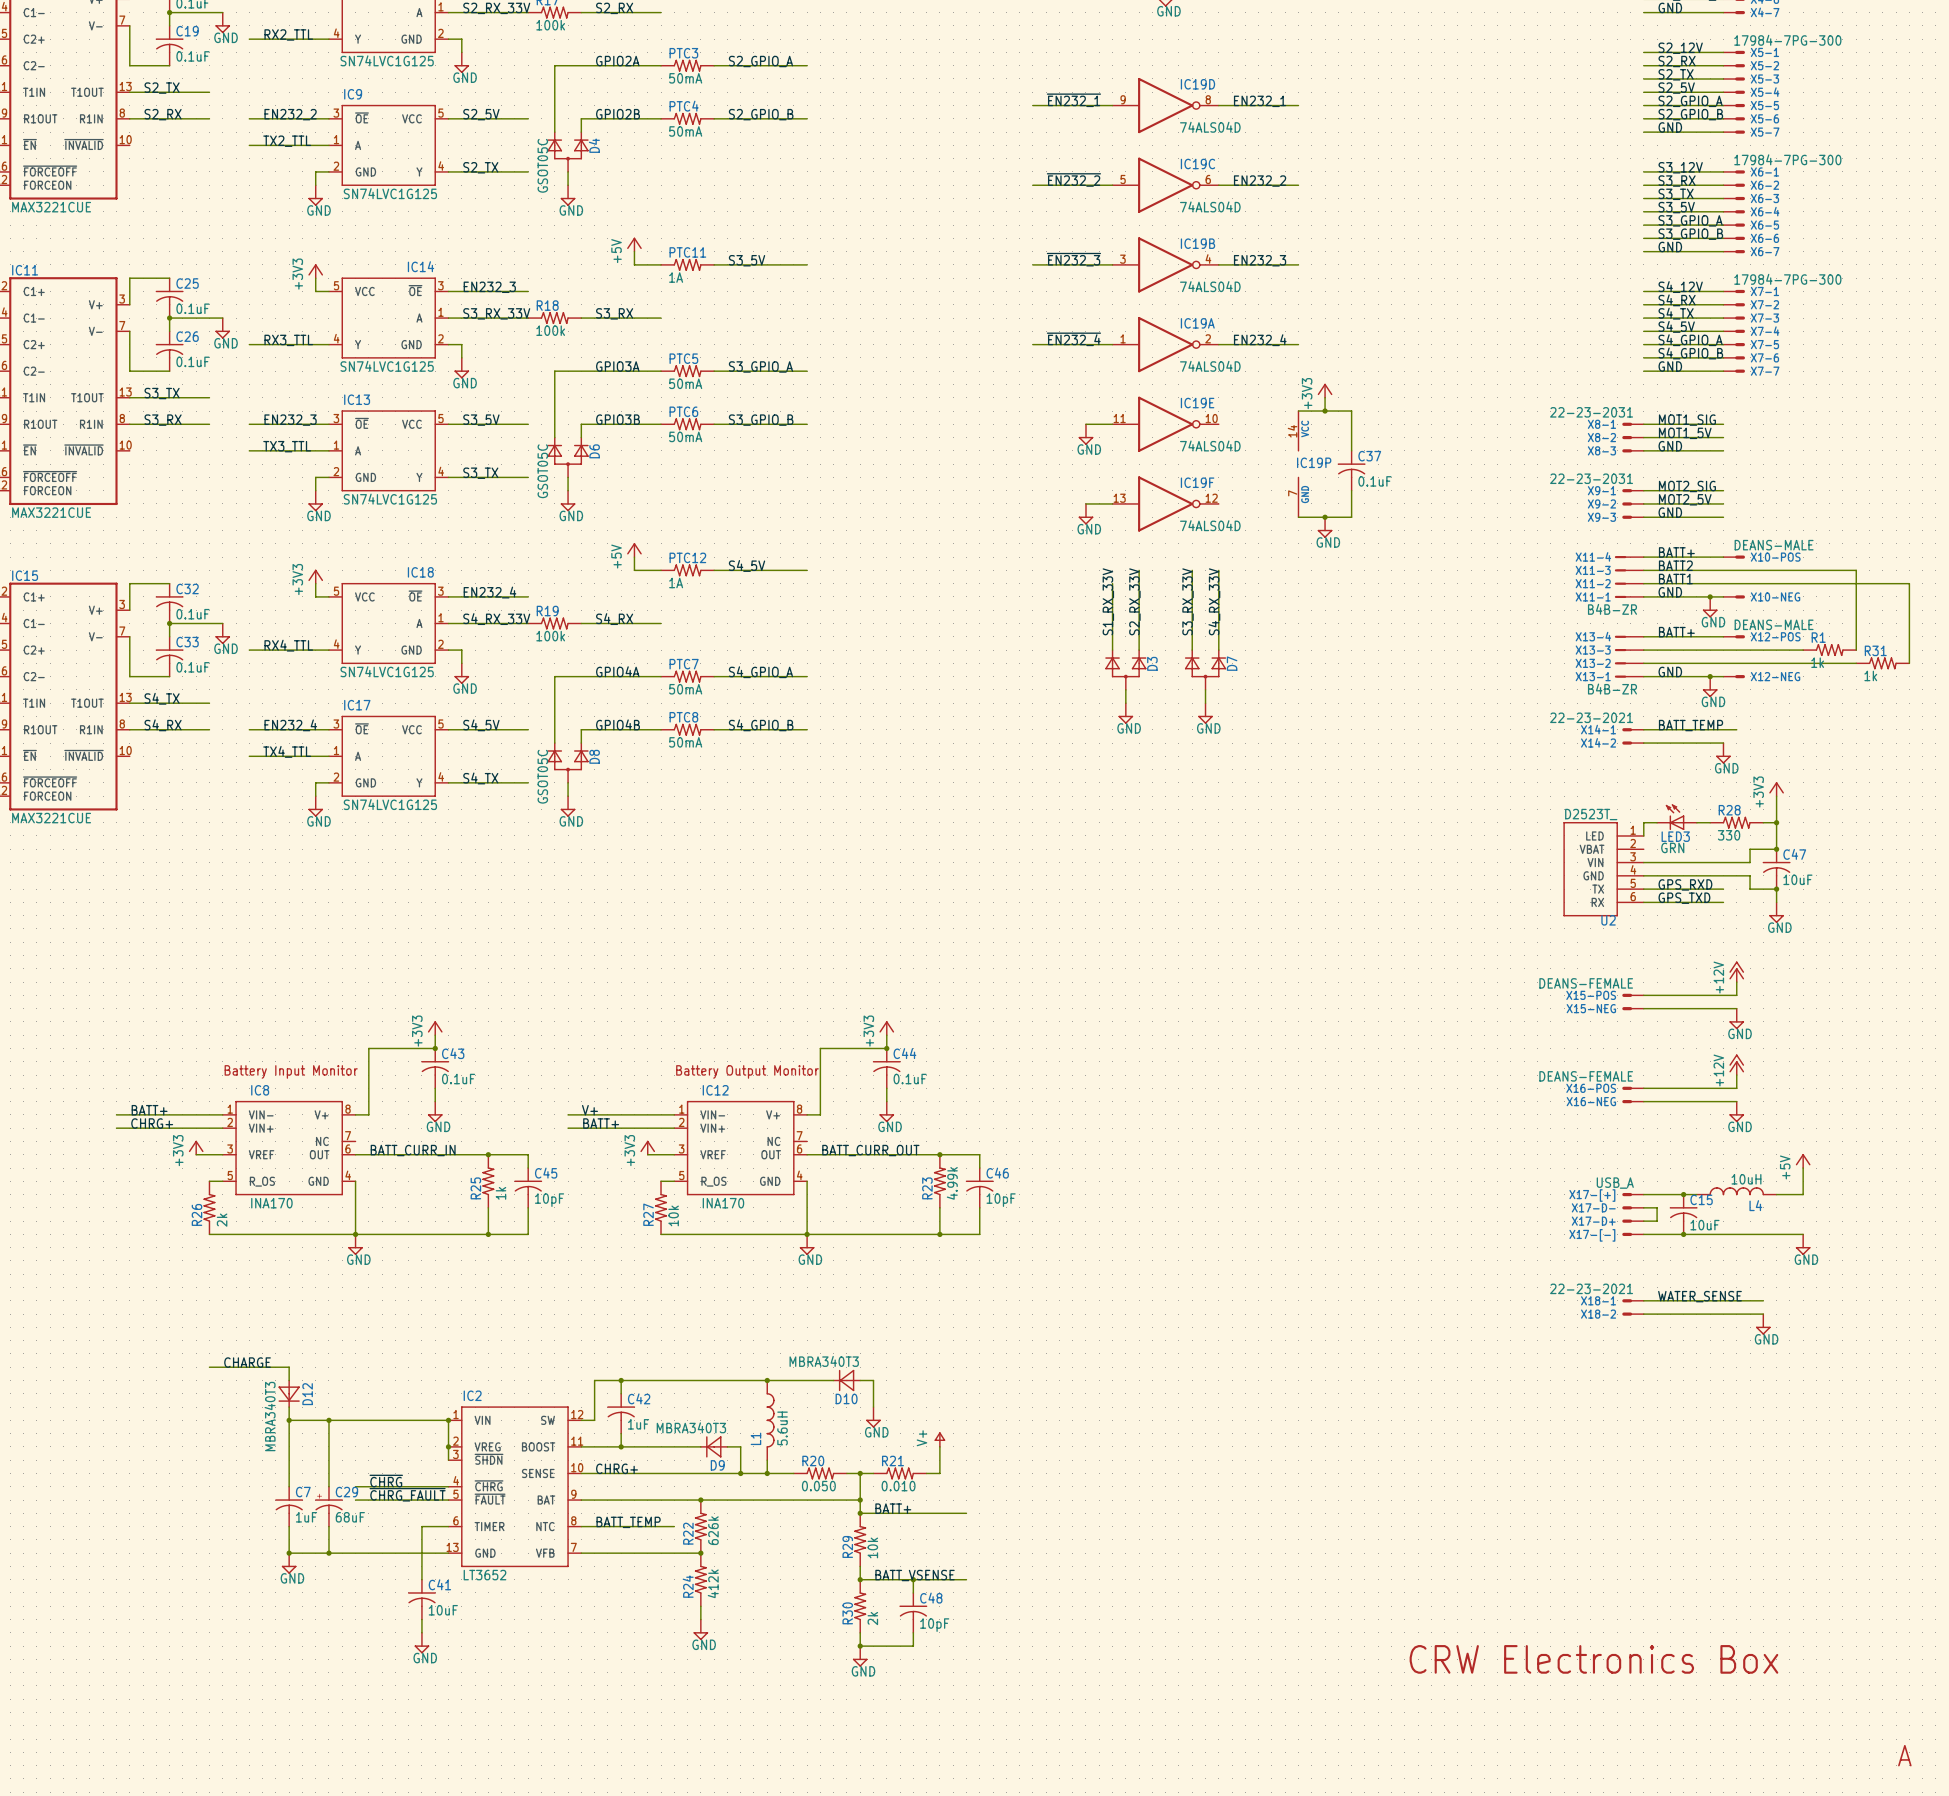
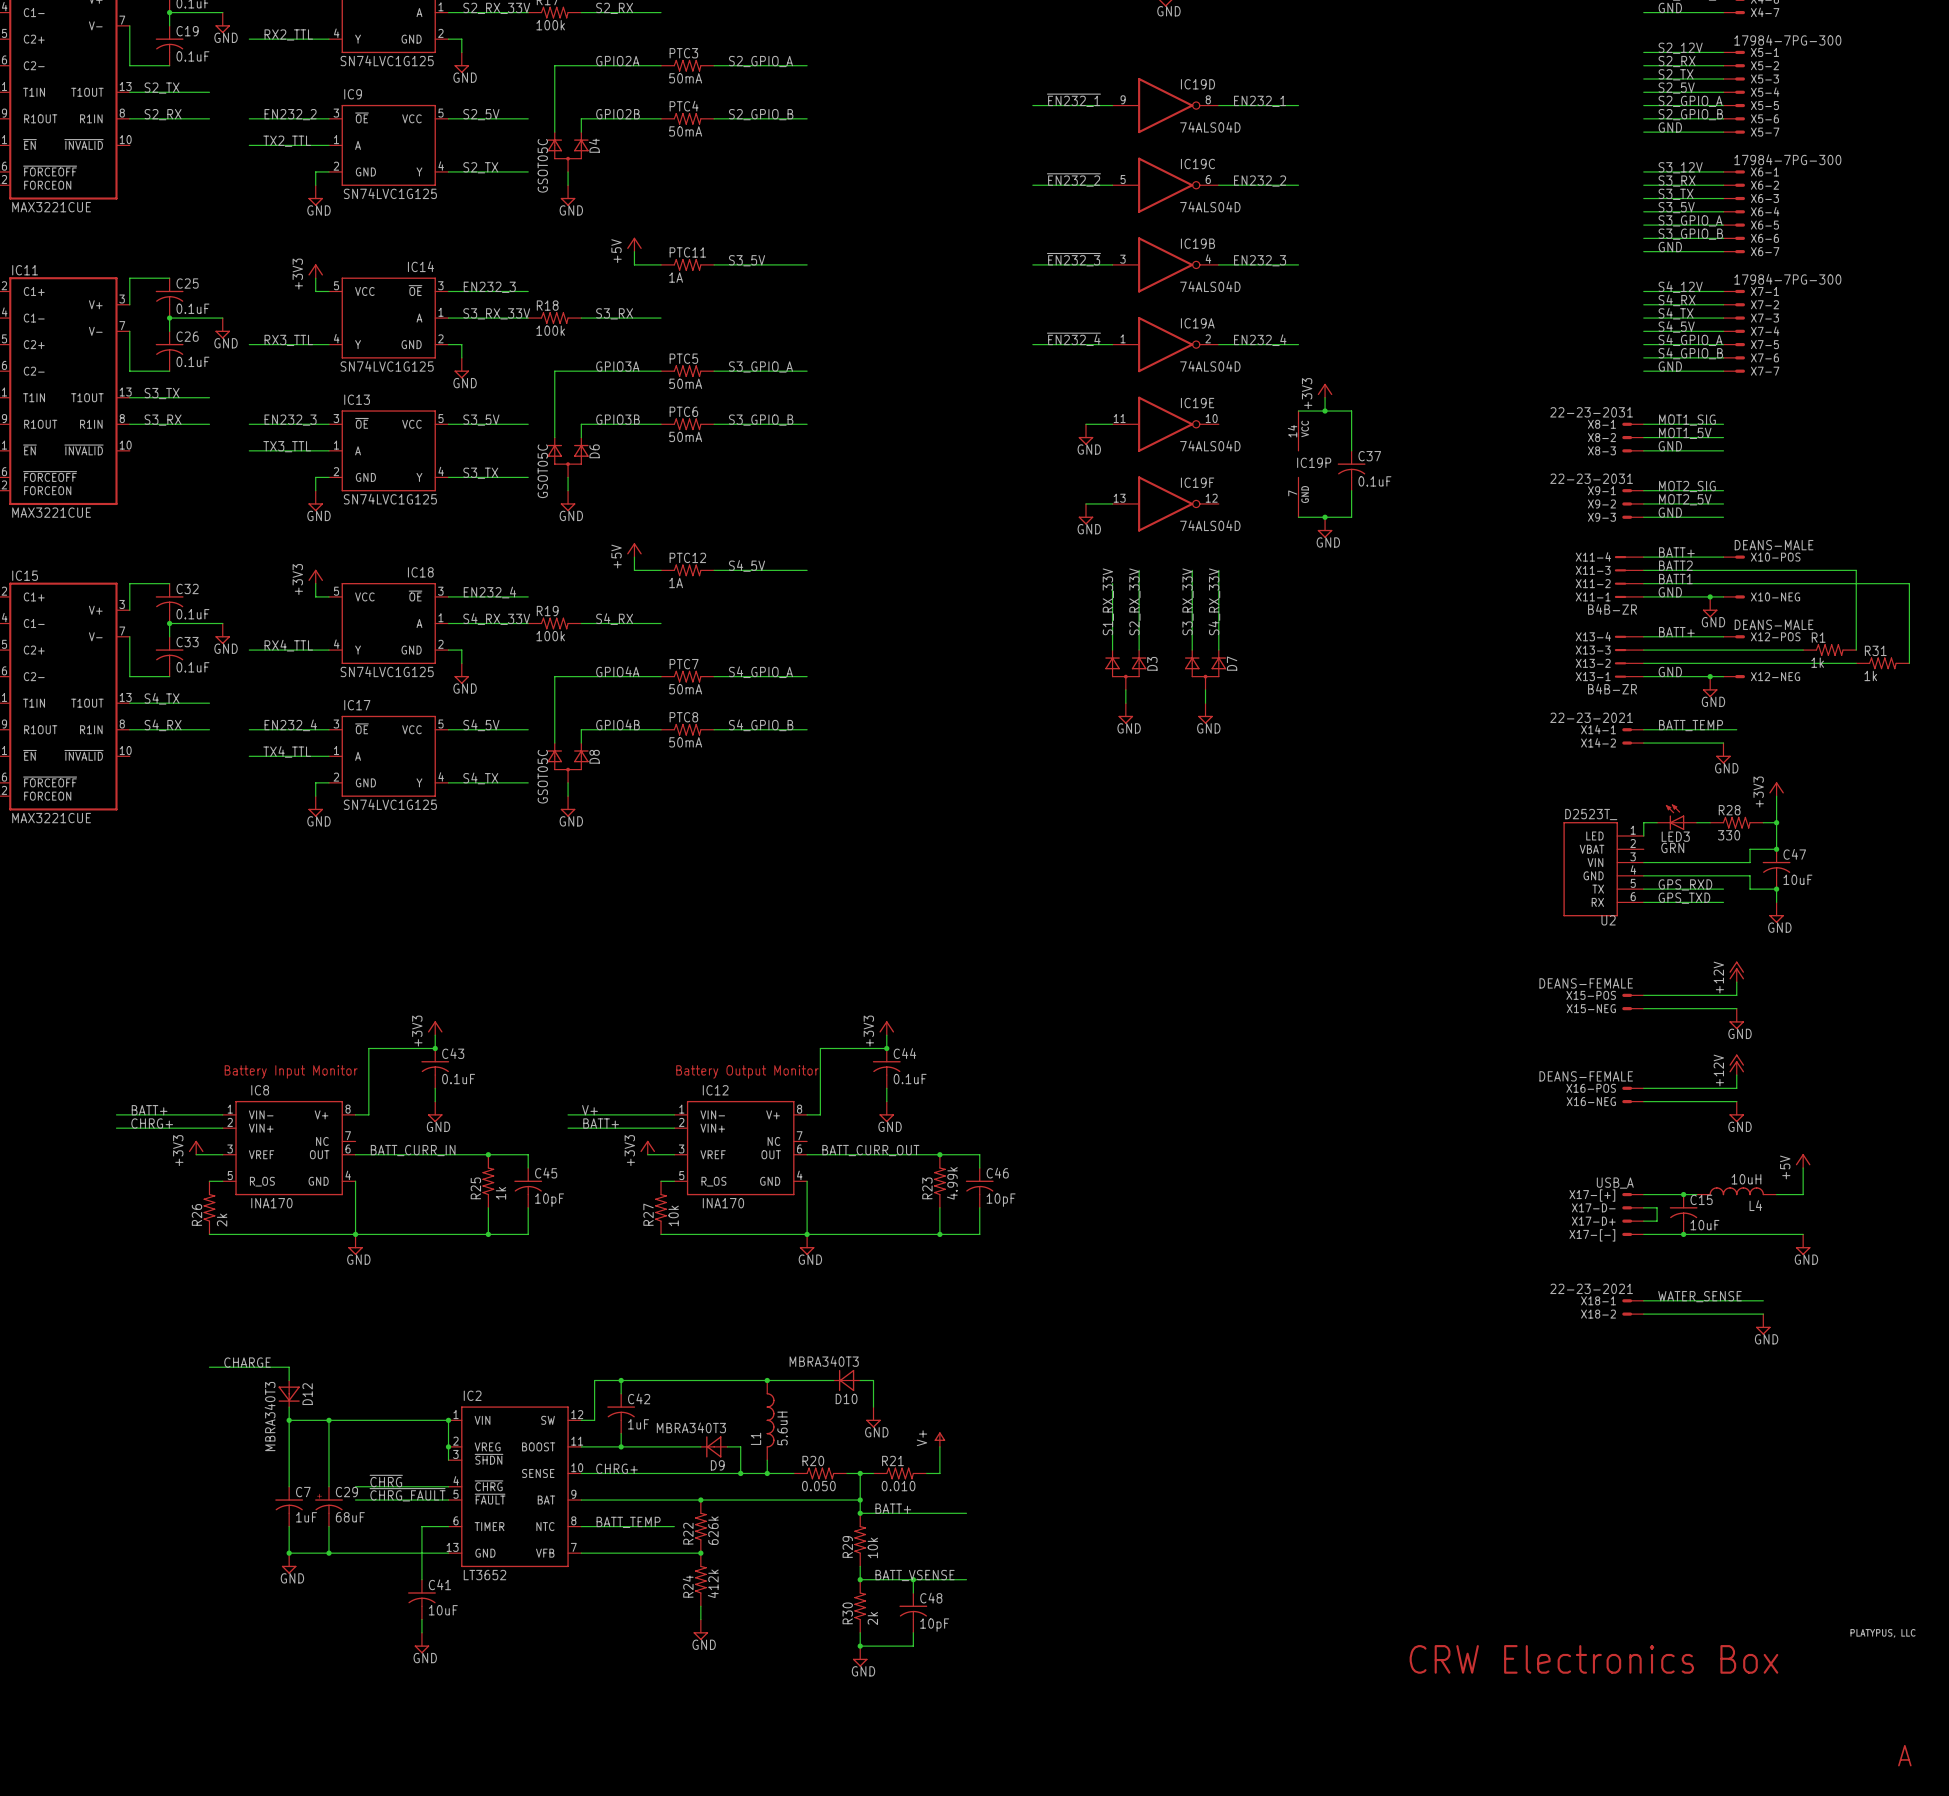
part: none -> (1882, 1633)

